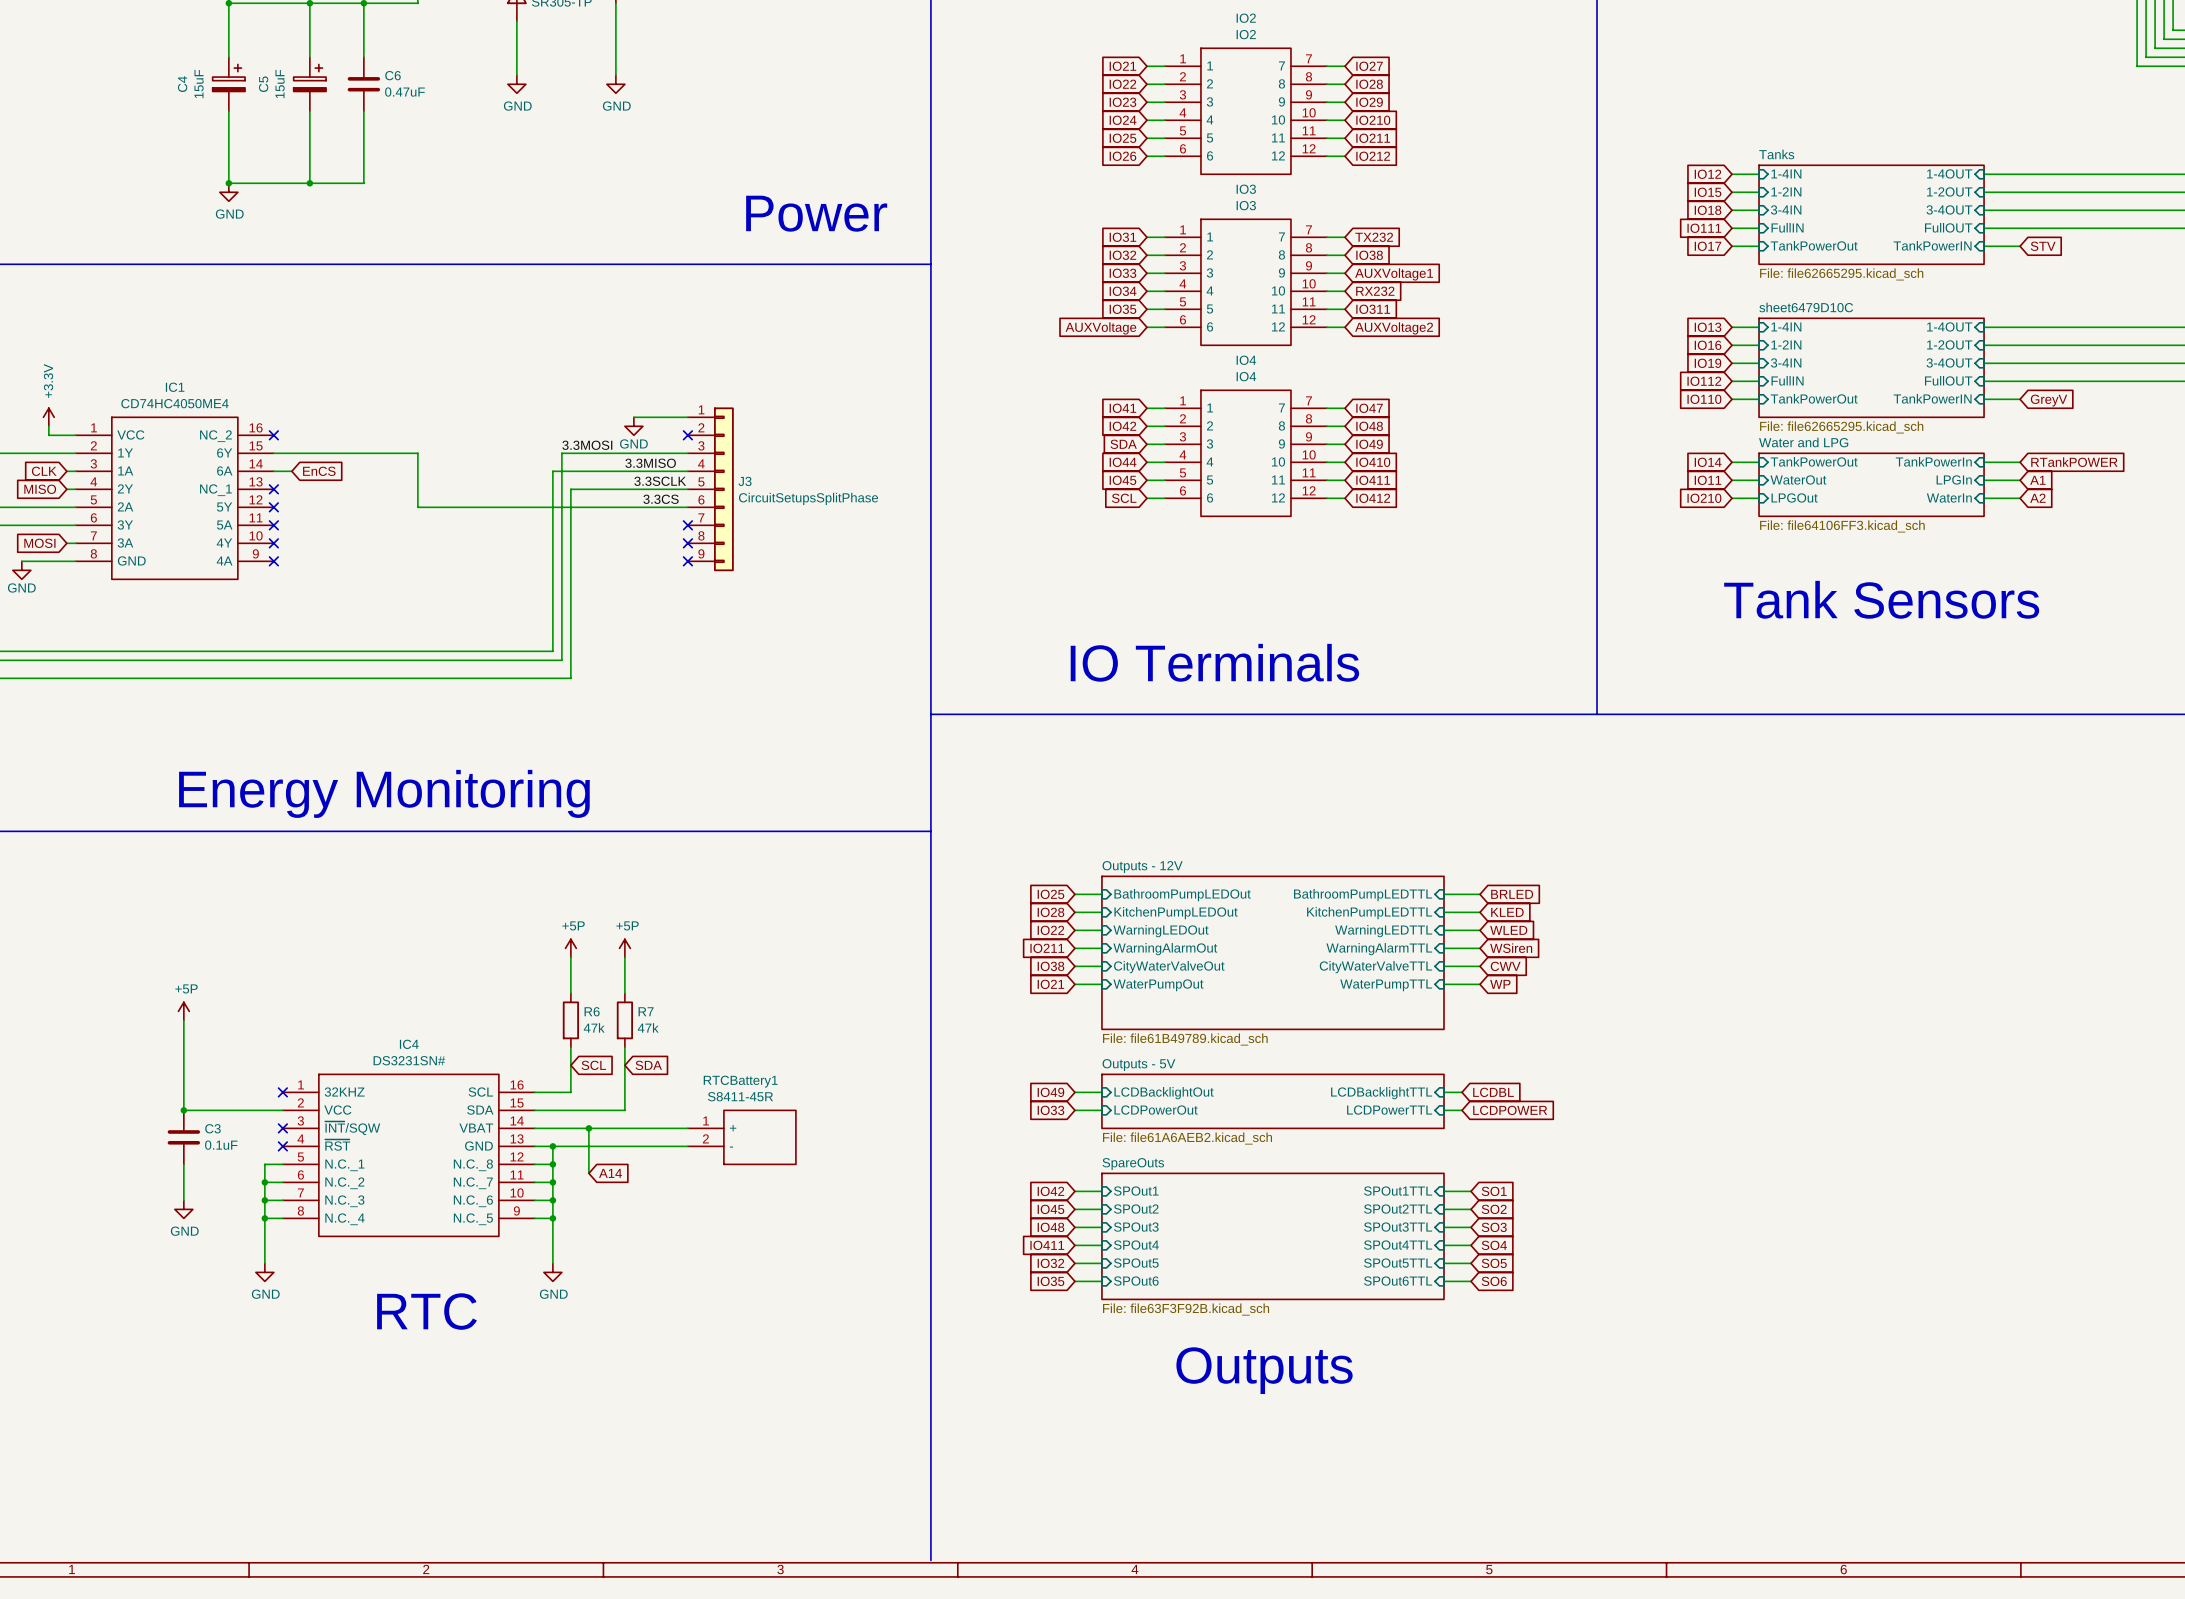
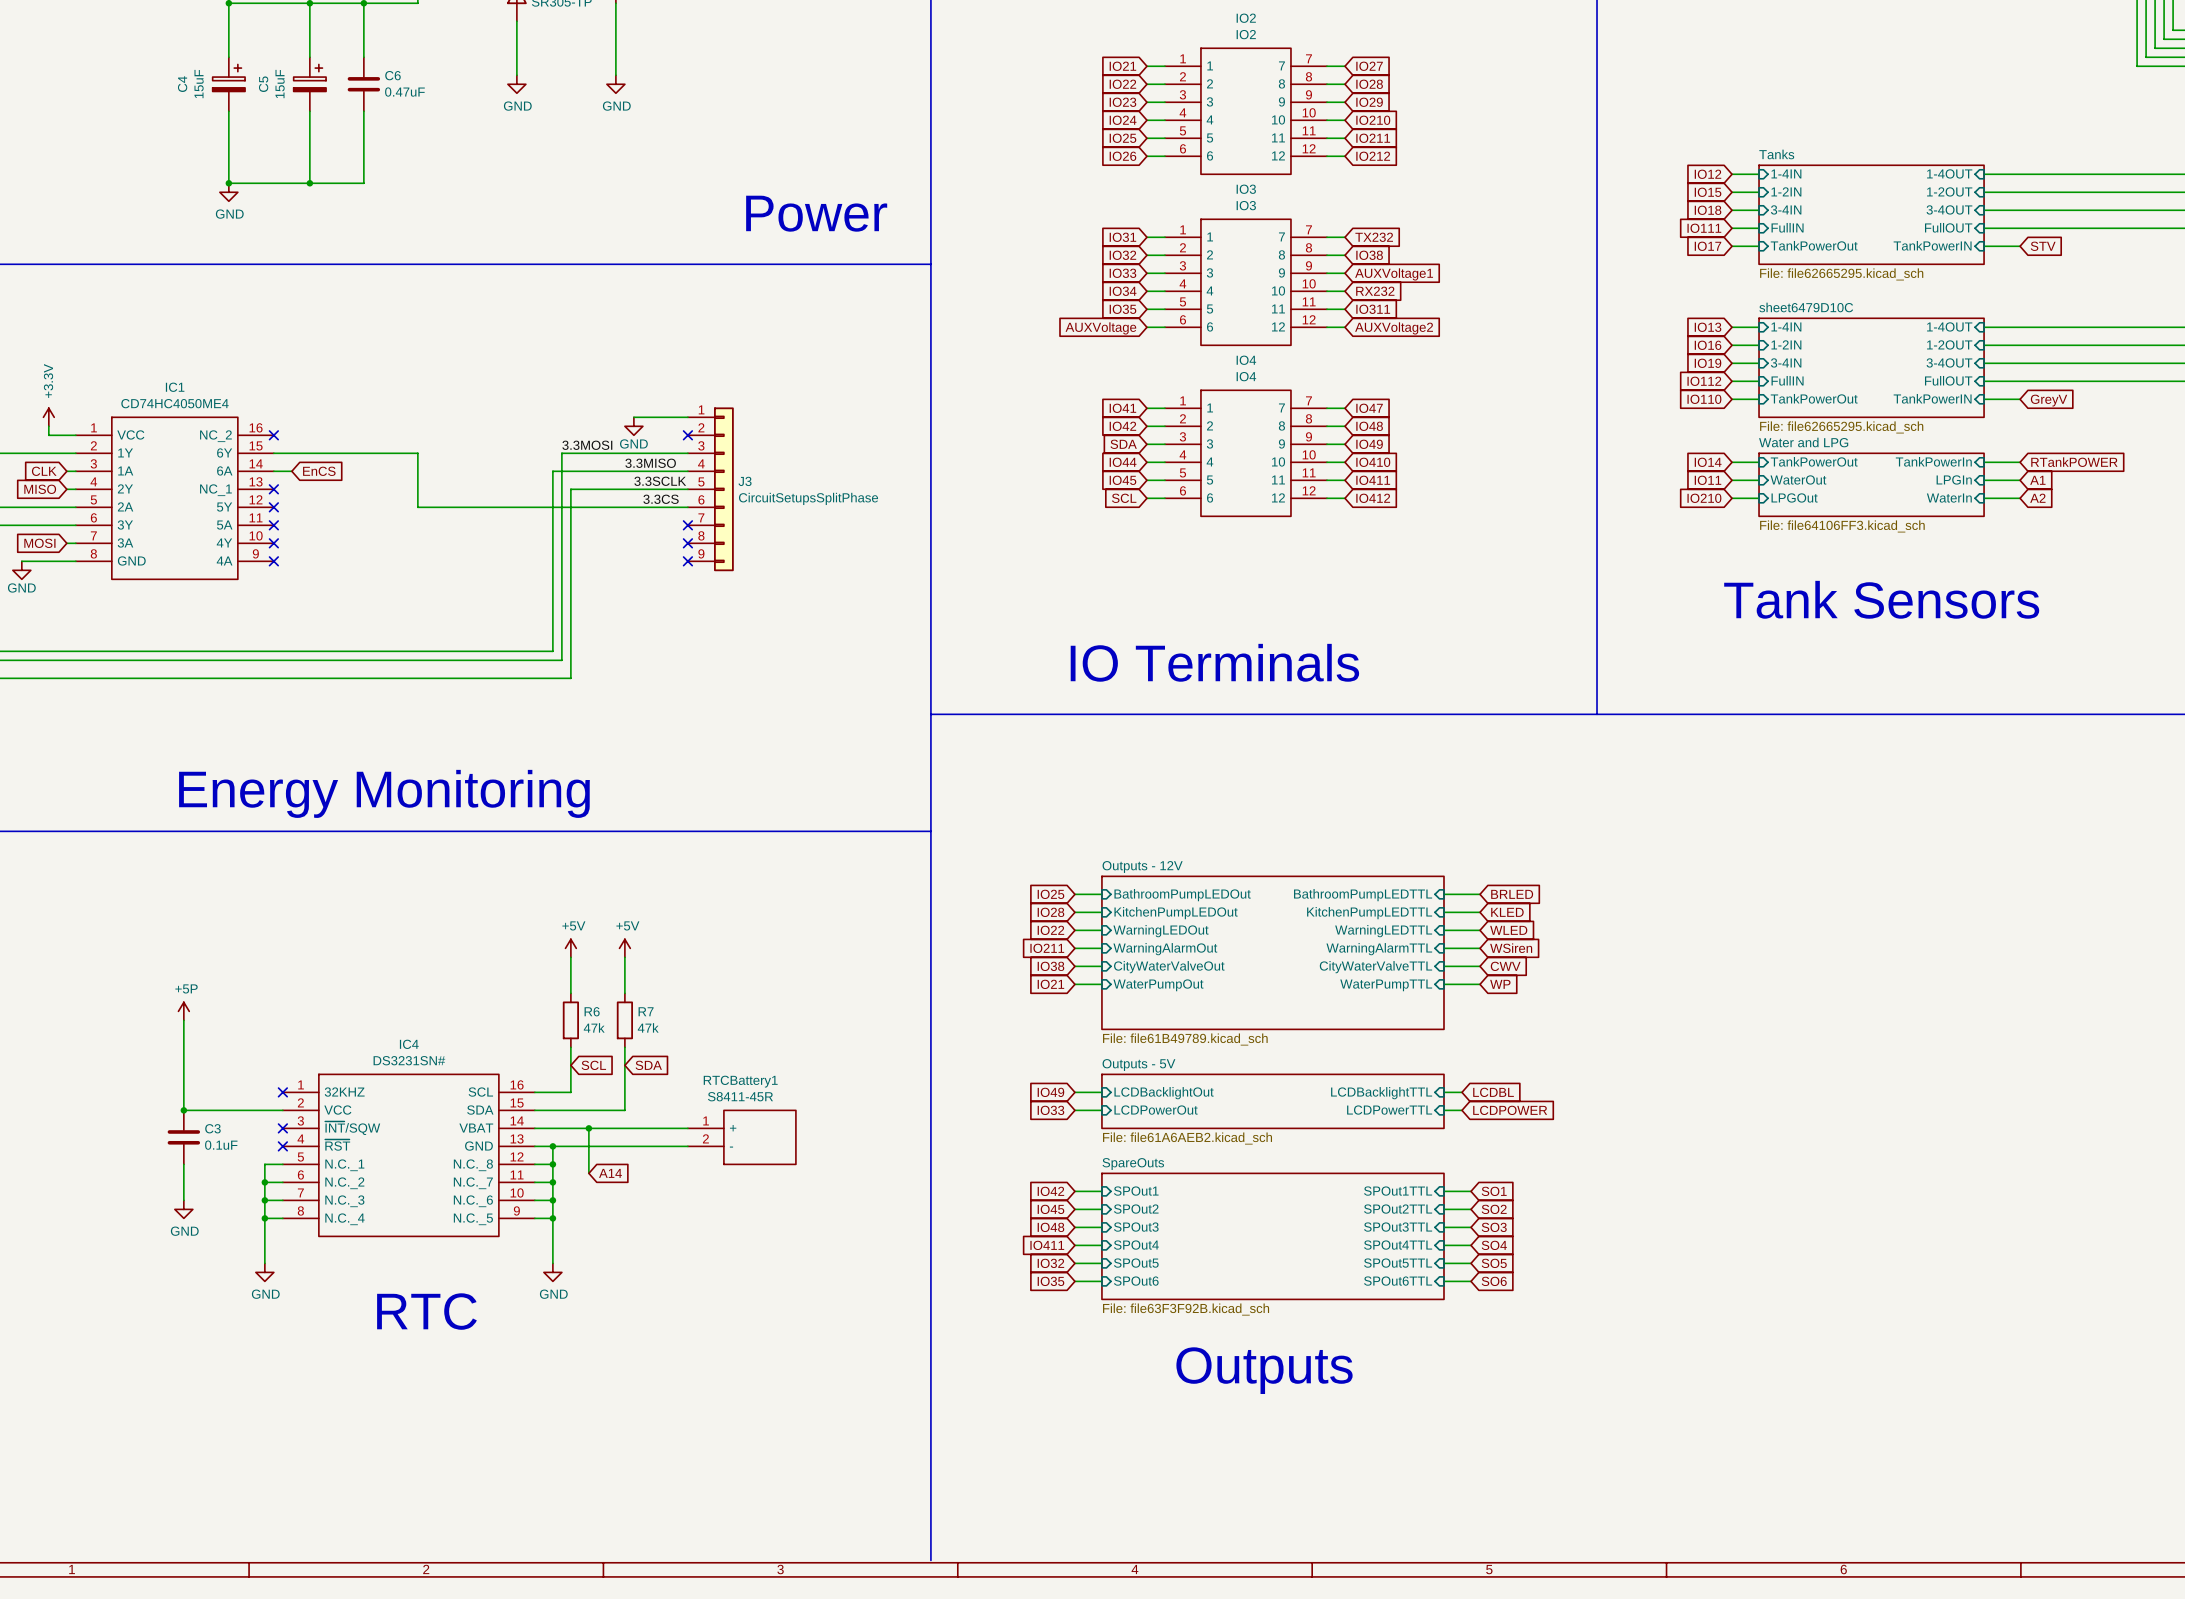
power symbol: +5P (570, 948) -> +5V (570, 948)
power symbol: +5P (624, 948) -> +5V (624, 948)

